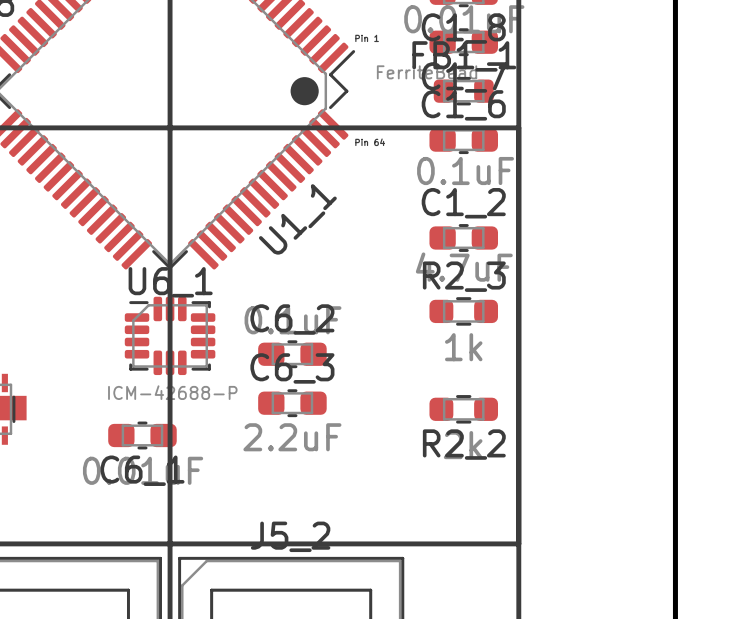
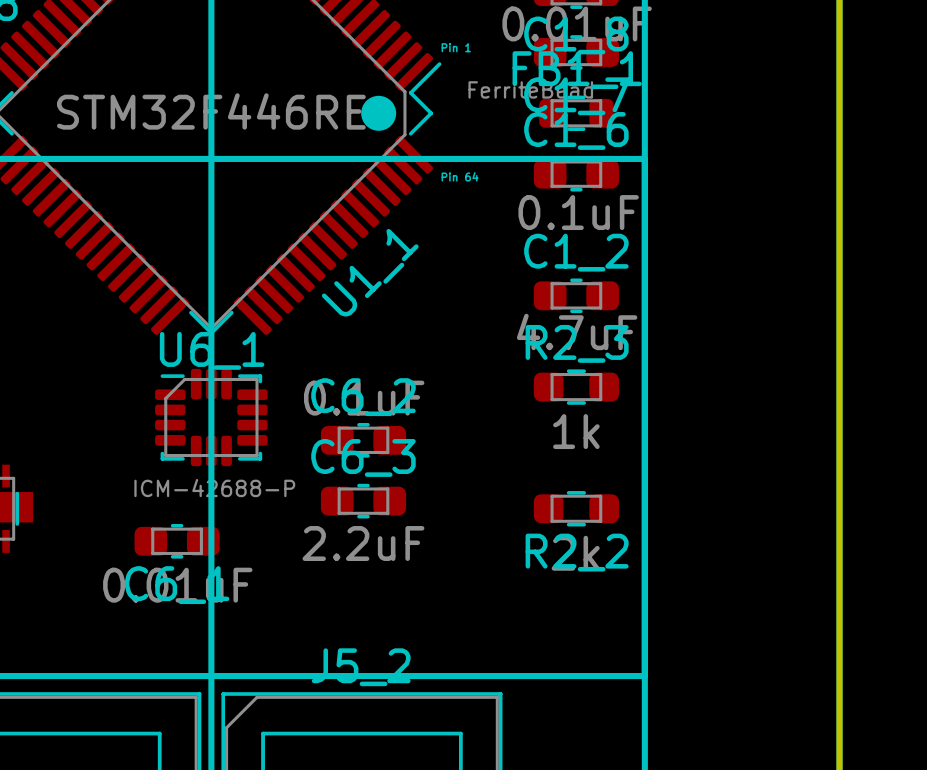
U1_1 value: none -> STM32F446RE (211, 111)

